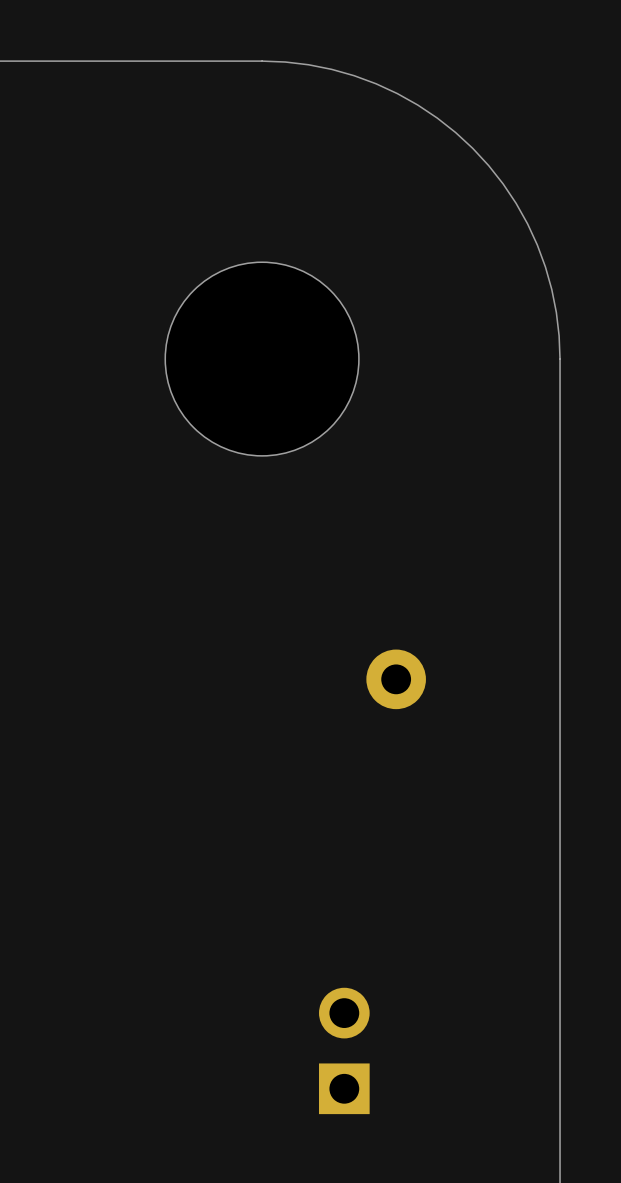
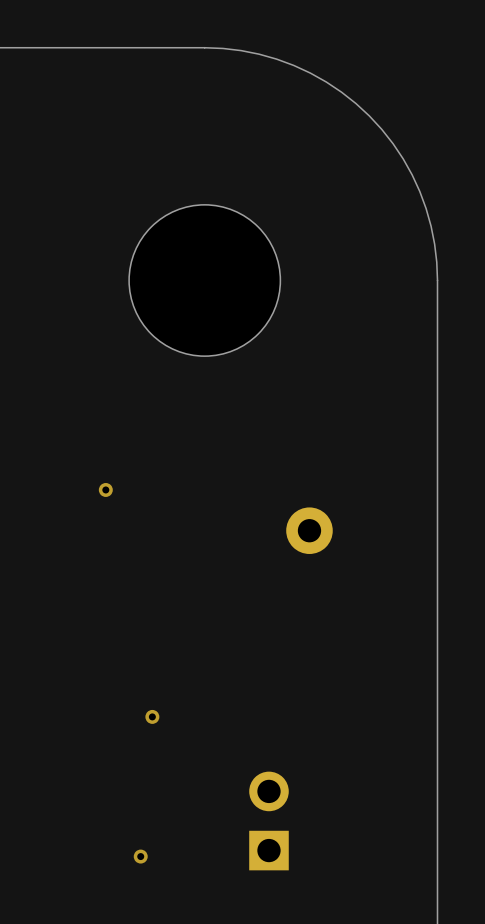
via: none -> (105, 489)
via: none -> (152, 716)
via: none -> (140, 856)

